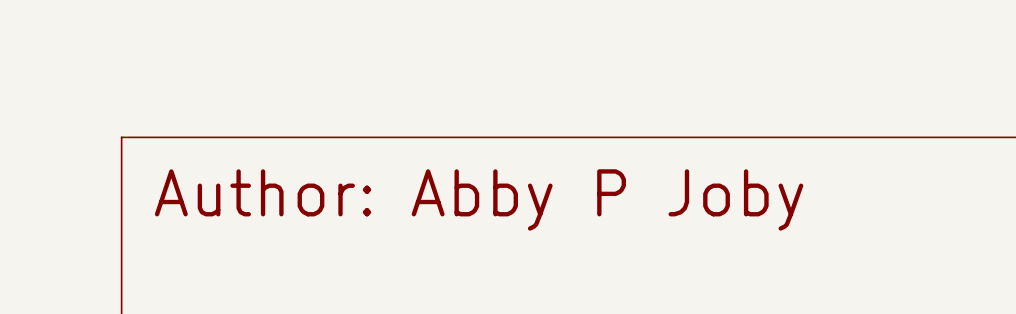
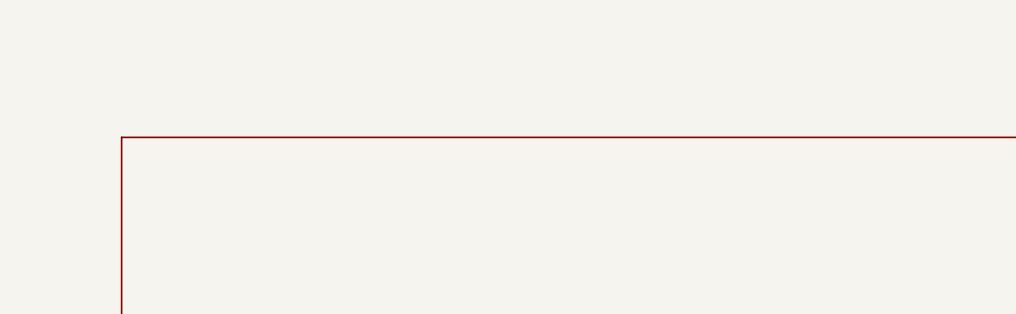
title block: Author: Abby P Joby (479, 199) -> none

